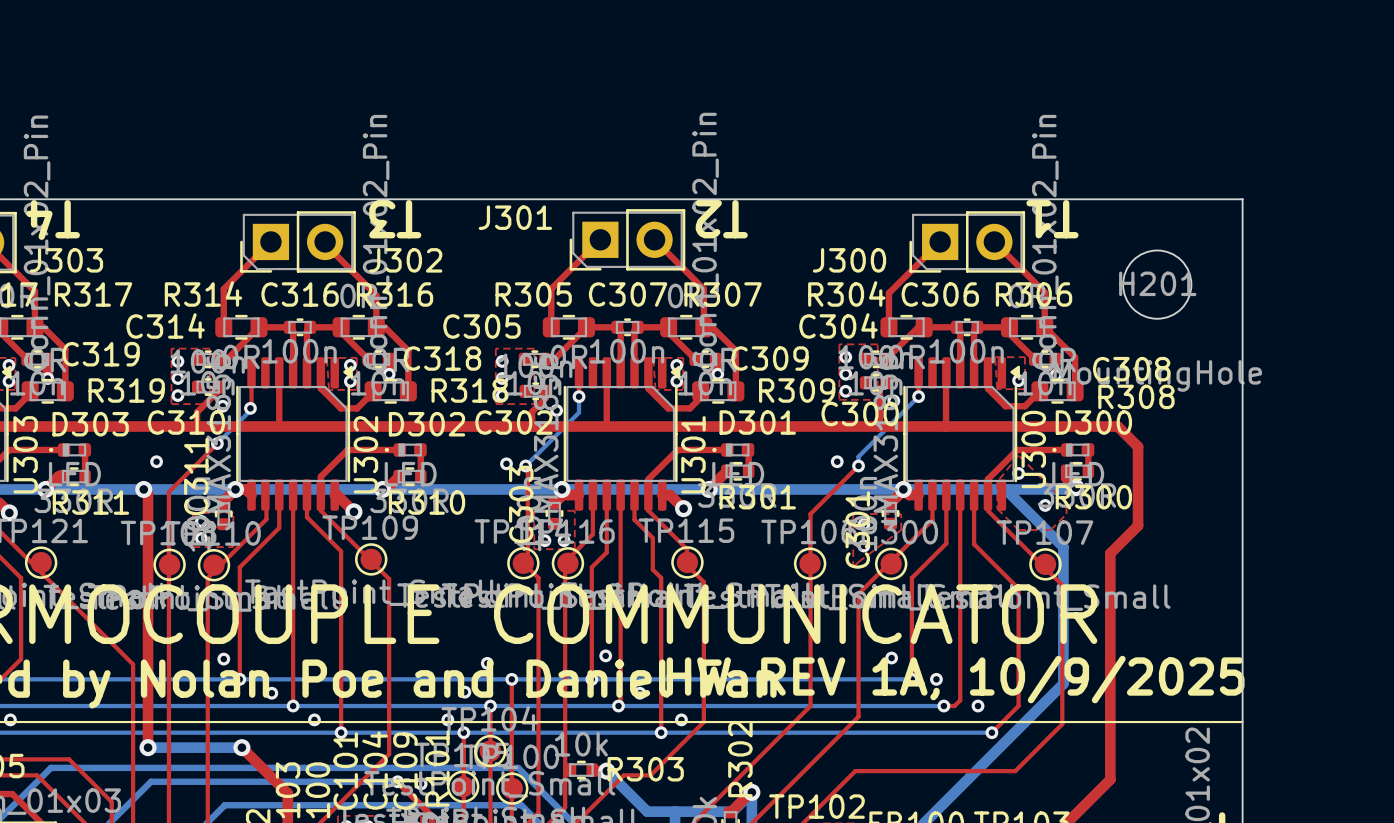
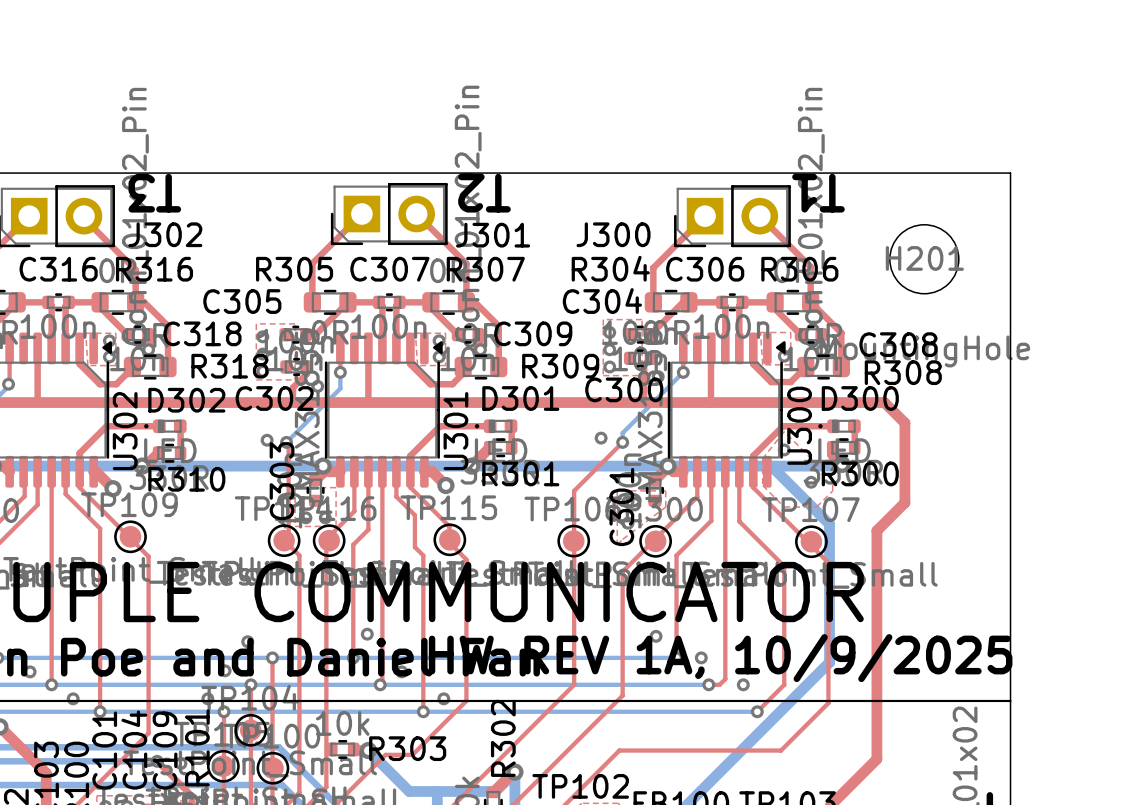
J301 name position: J301 (515, 217) -> J301 (493, 235)

